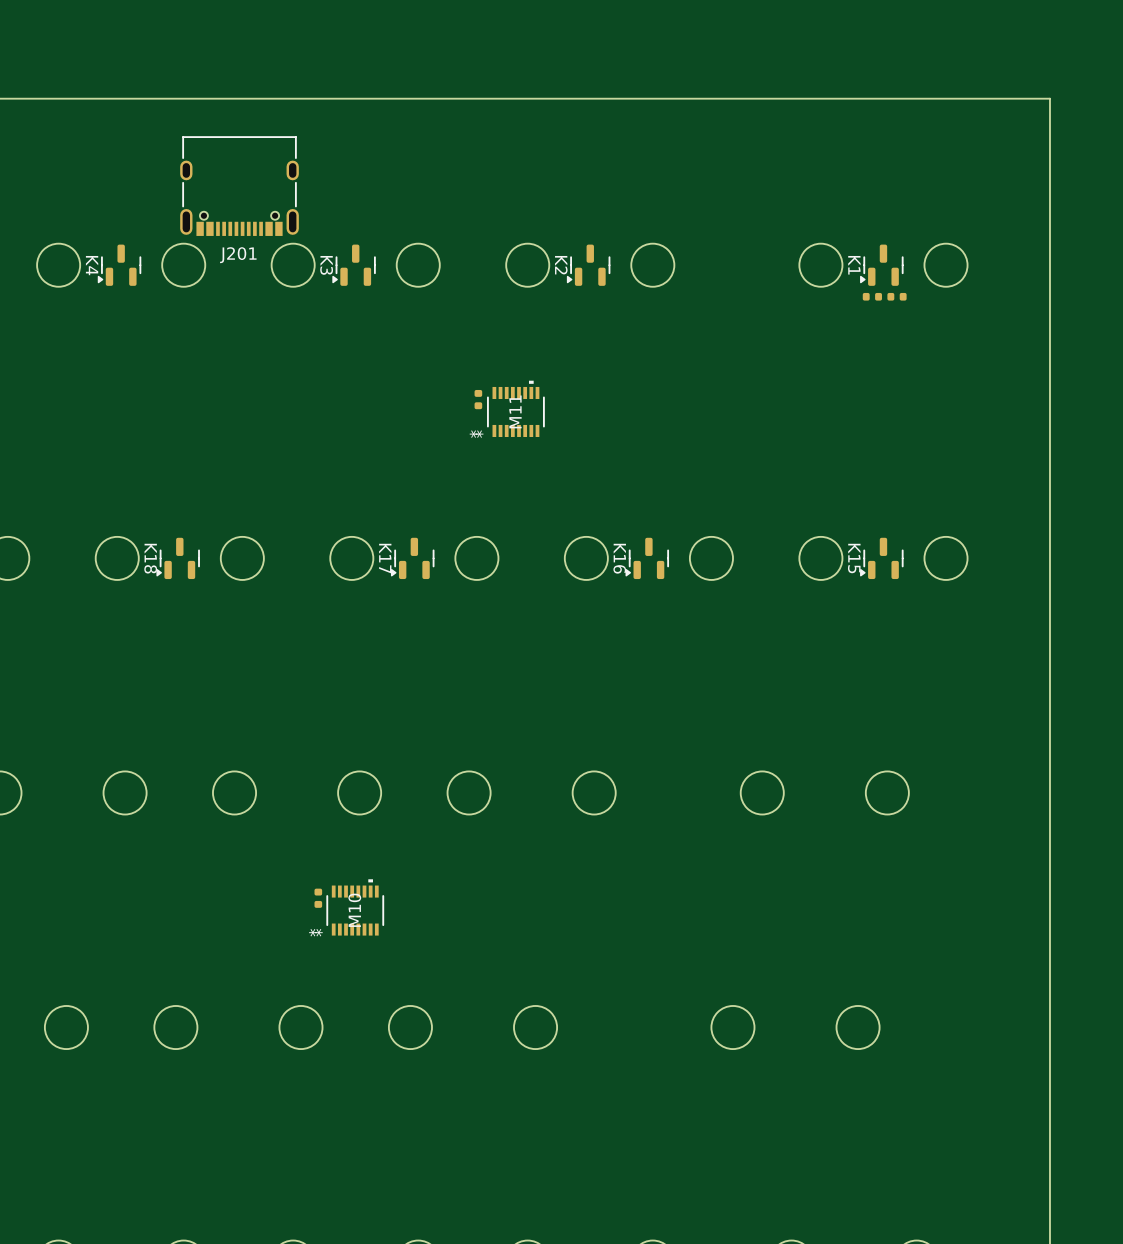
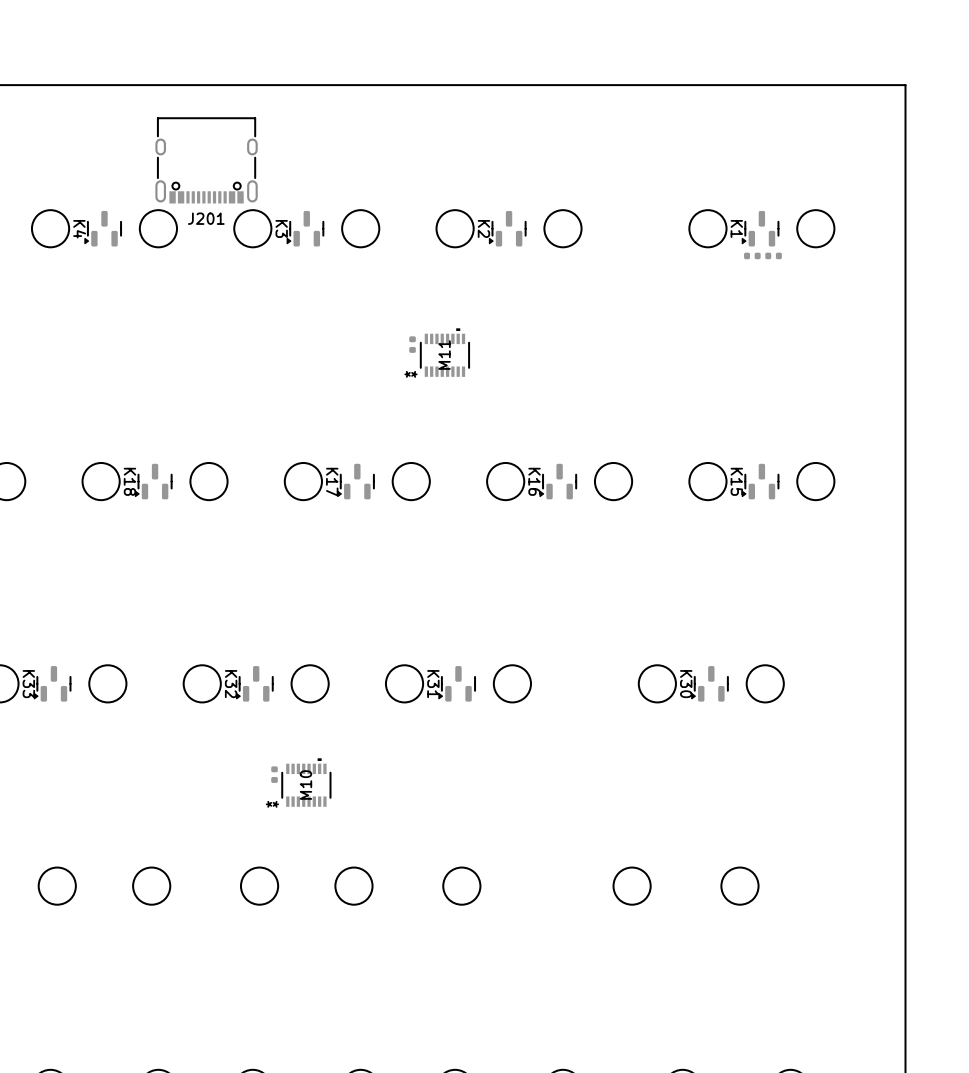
K33: none -> (52, 683)
K32: none -> (254, 683)
K31: none -> (456, 683)
K30: none -> (709, 683)

